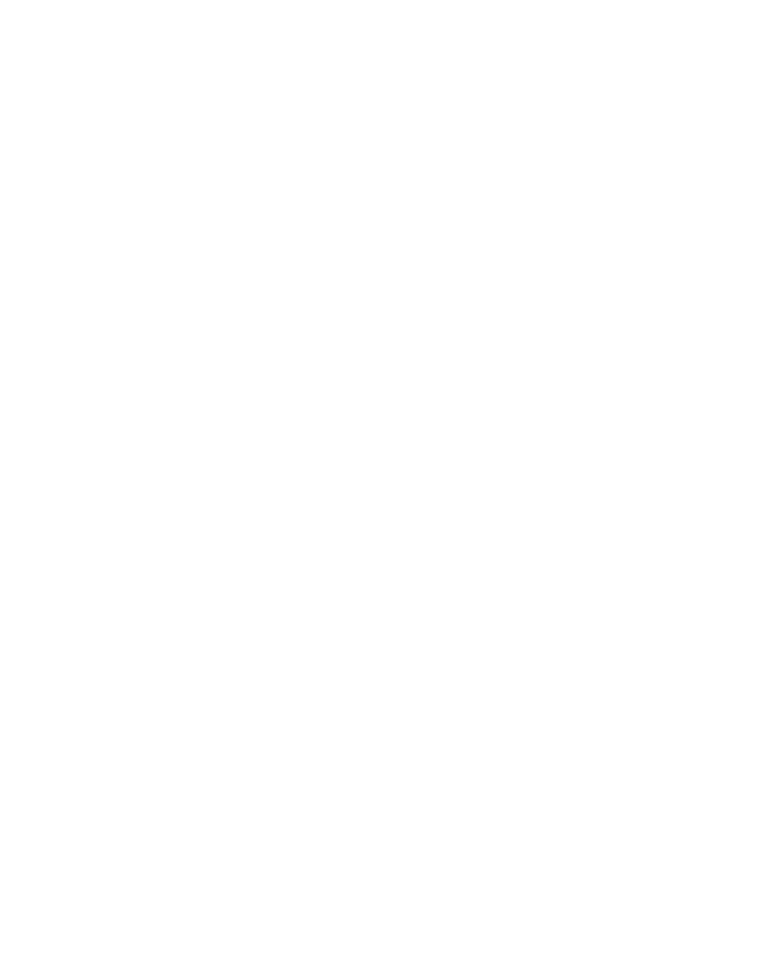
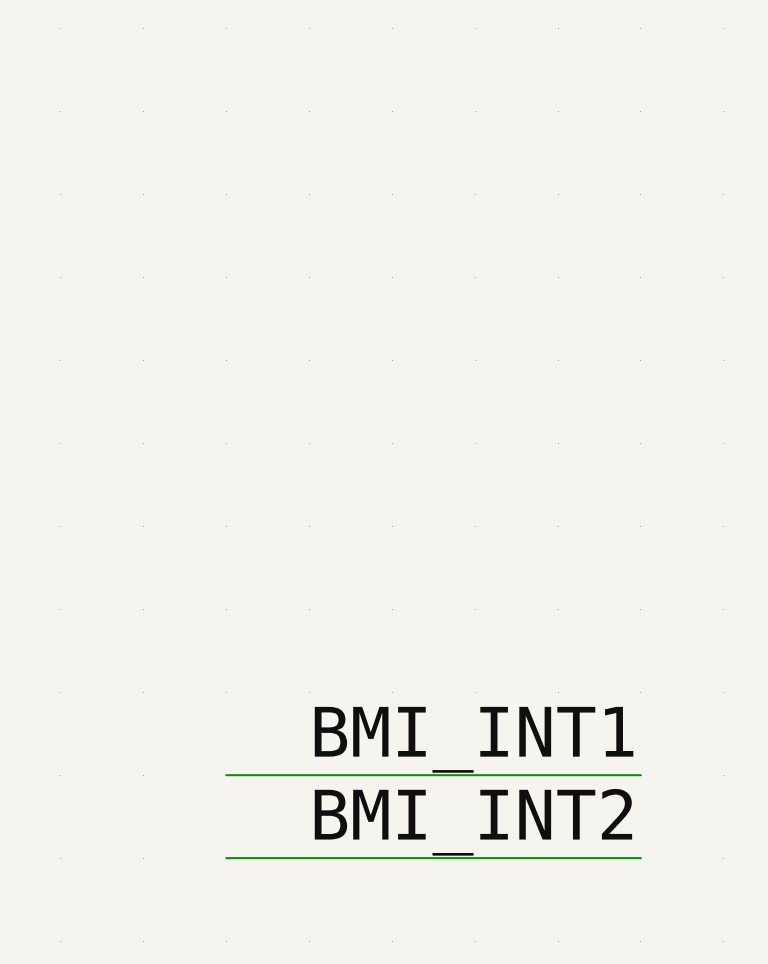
label: none -> BMI_INT1 (474, 739)
wire: none -> (226, 775) (640, 775)
label: none -> BMI_INT2 (473, 822)
wire: none -> (226, 858) (640, 858)

